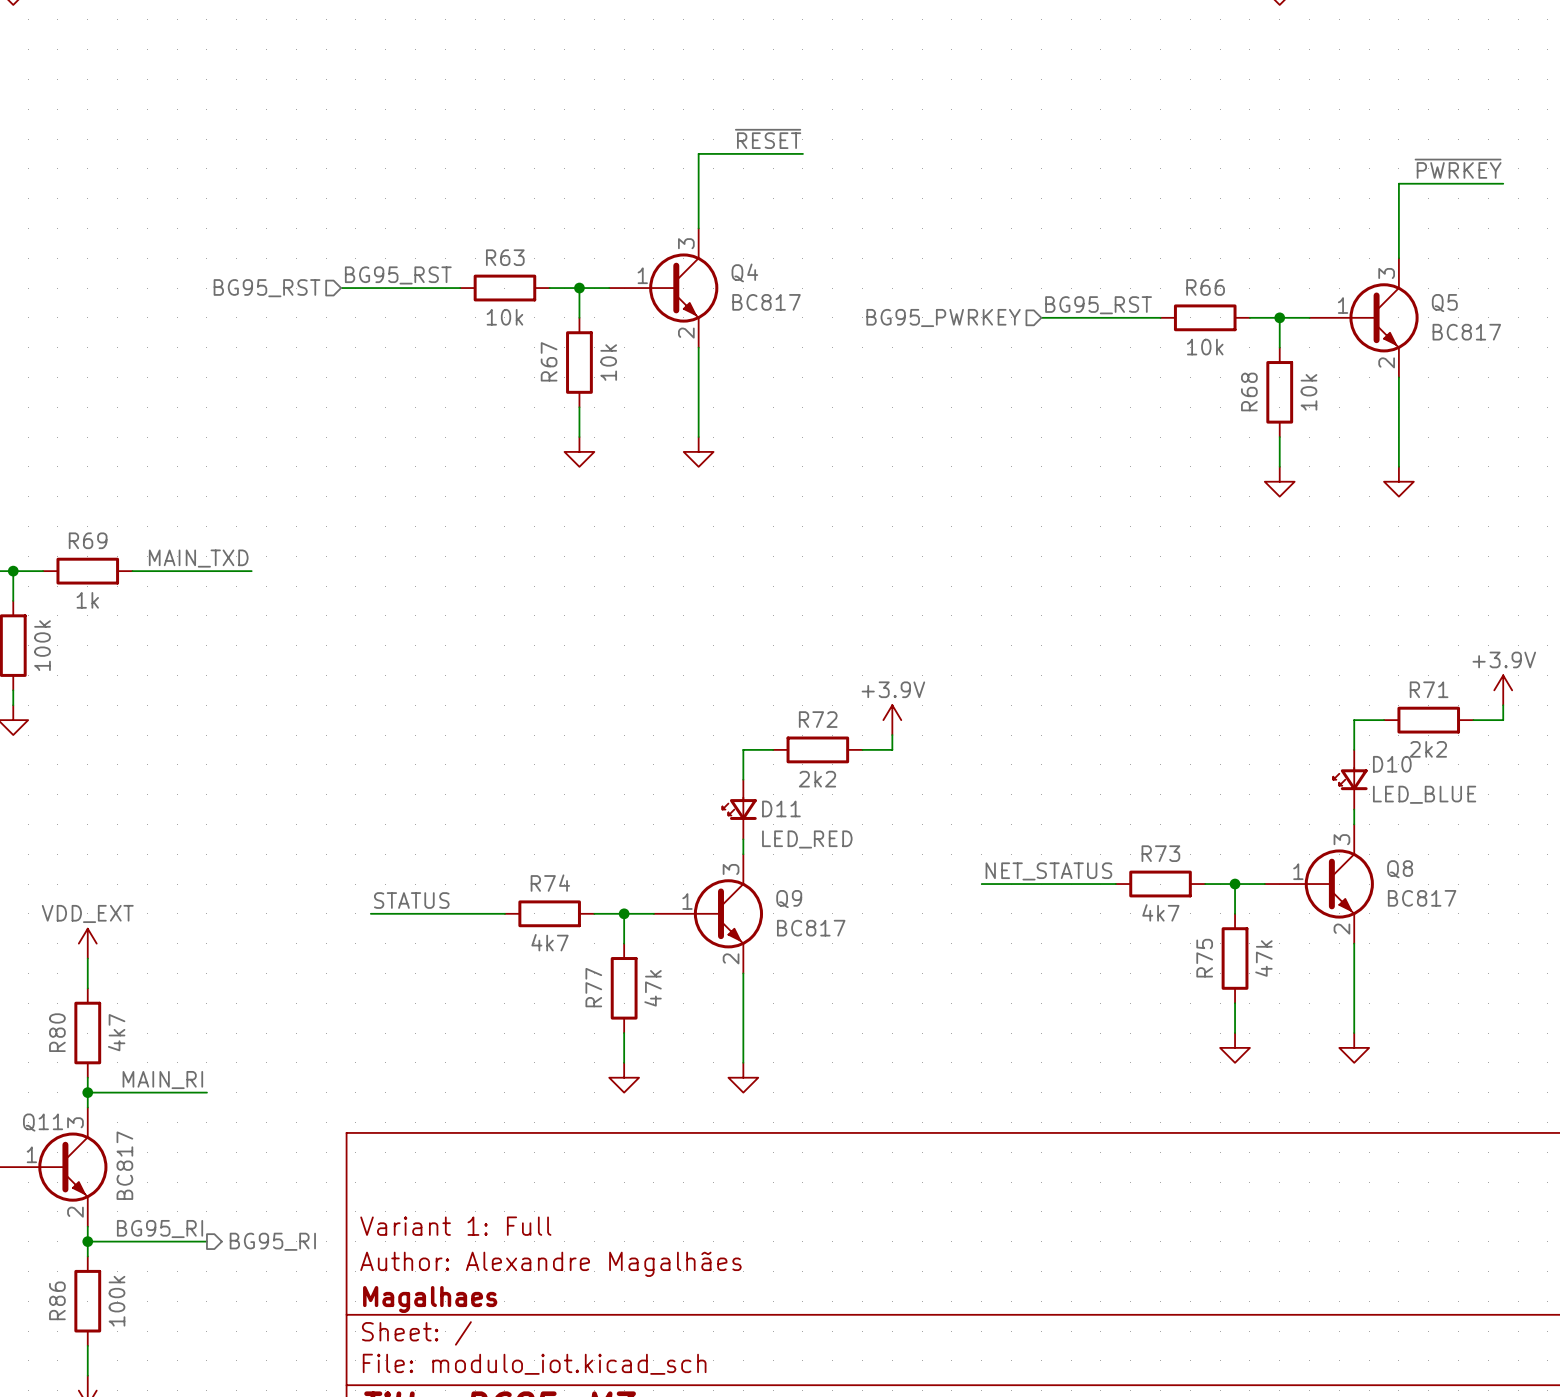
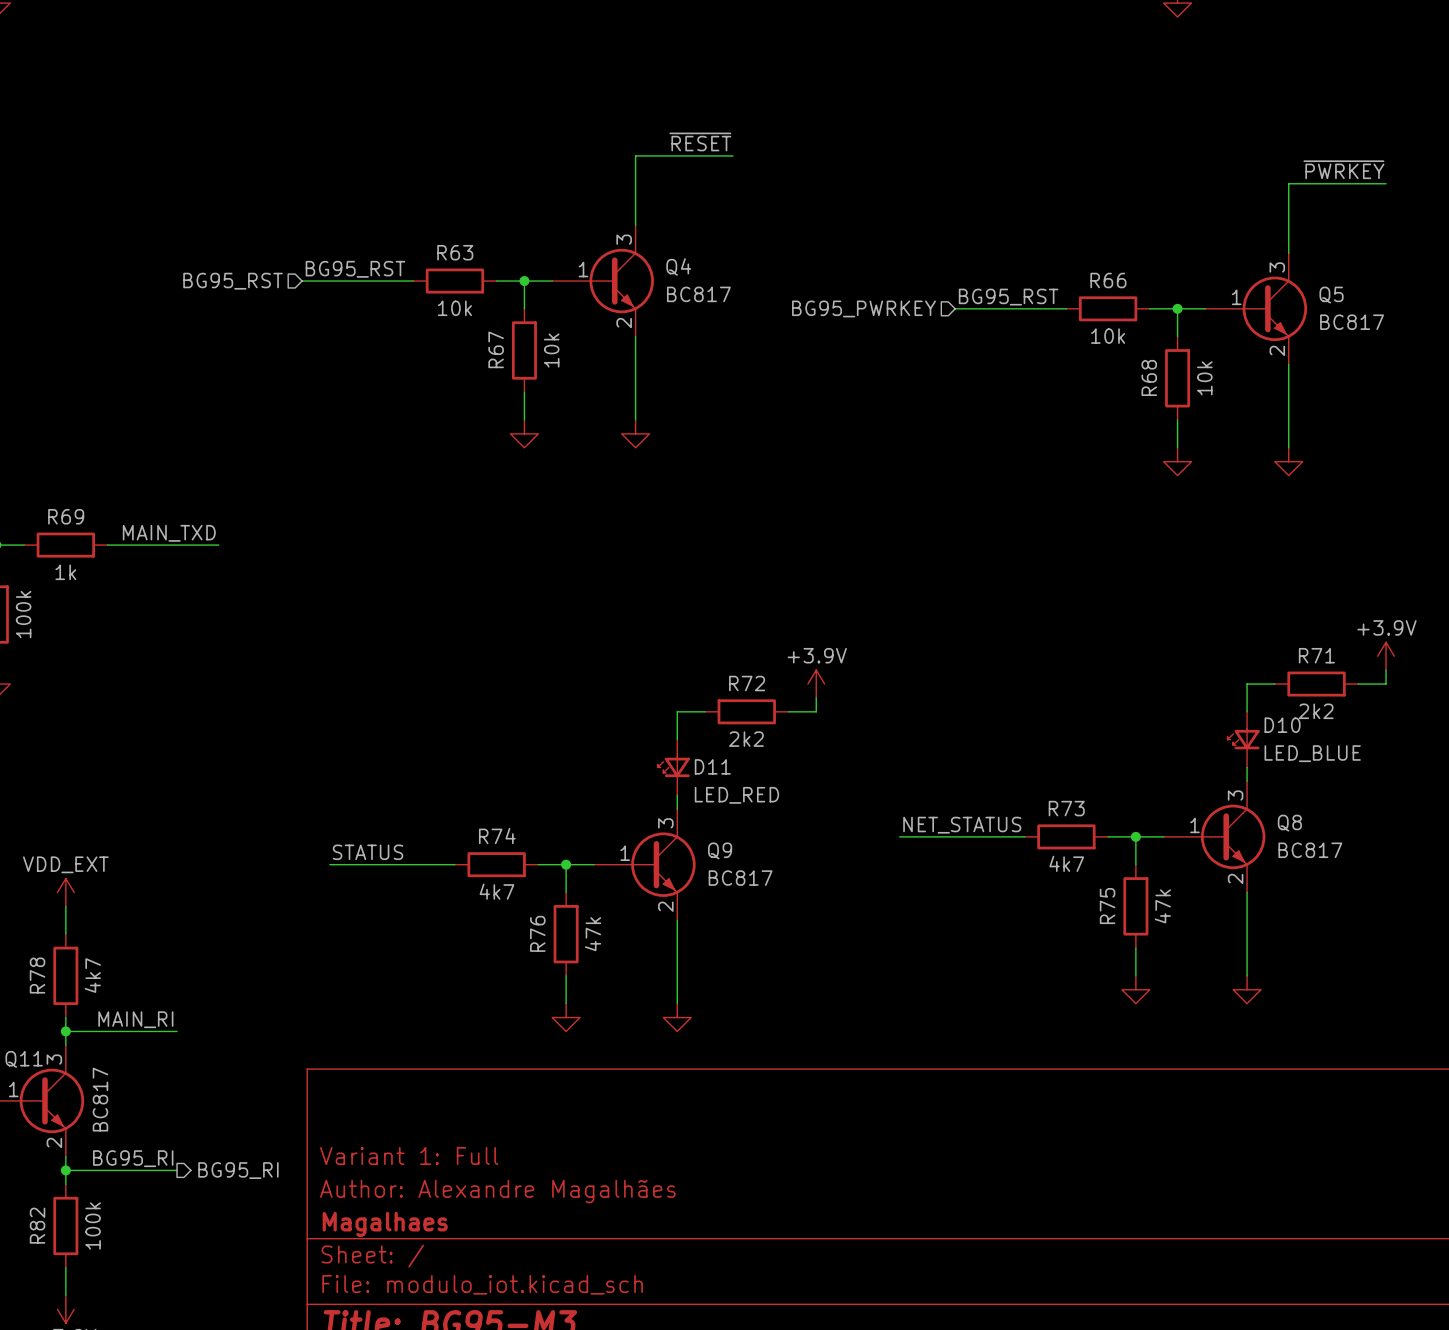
R77 name: R77 (593, 987) -> R76 (537, 933)
R80 name: R80 (57, 1032) -> R78 (37, 975)
R86 name: R86 (57, 1300) -> R82 (37, 1225)

